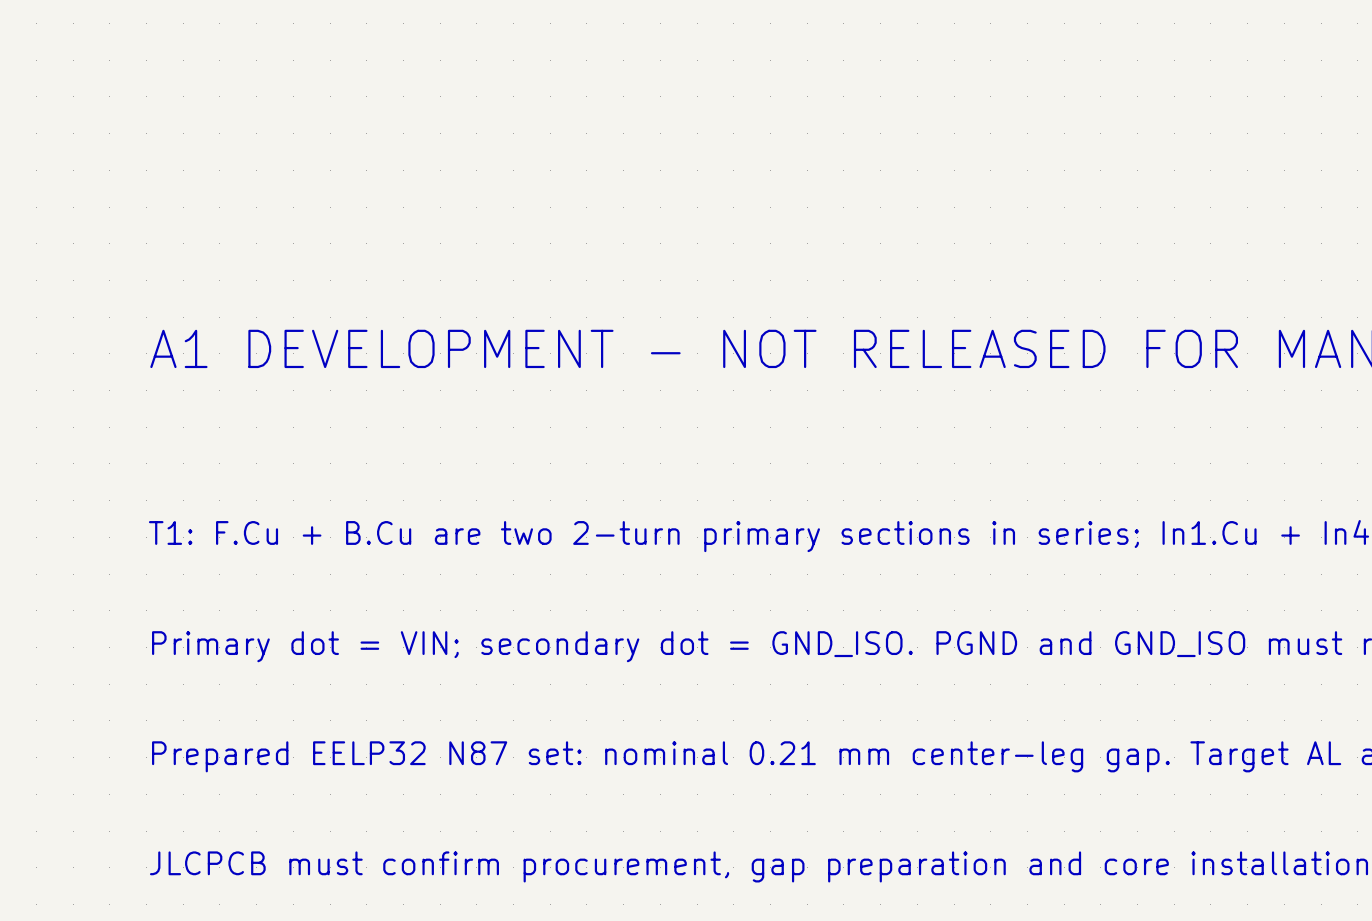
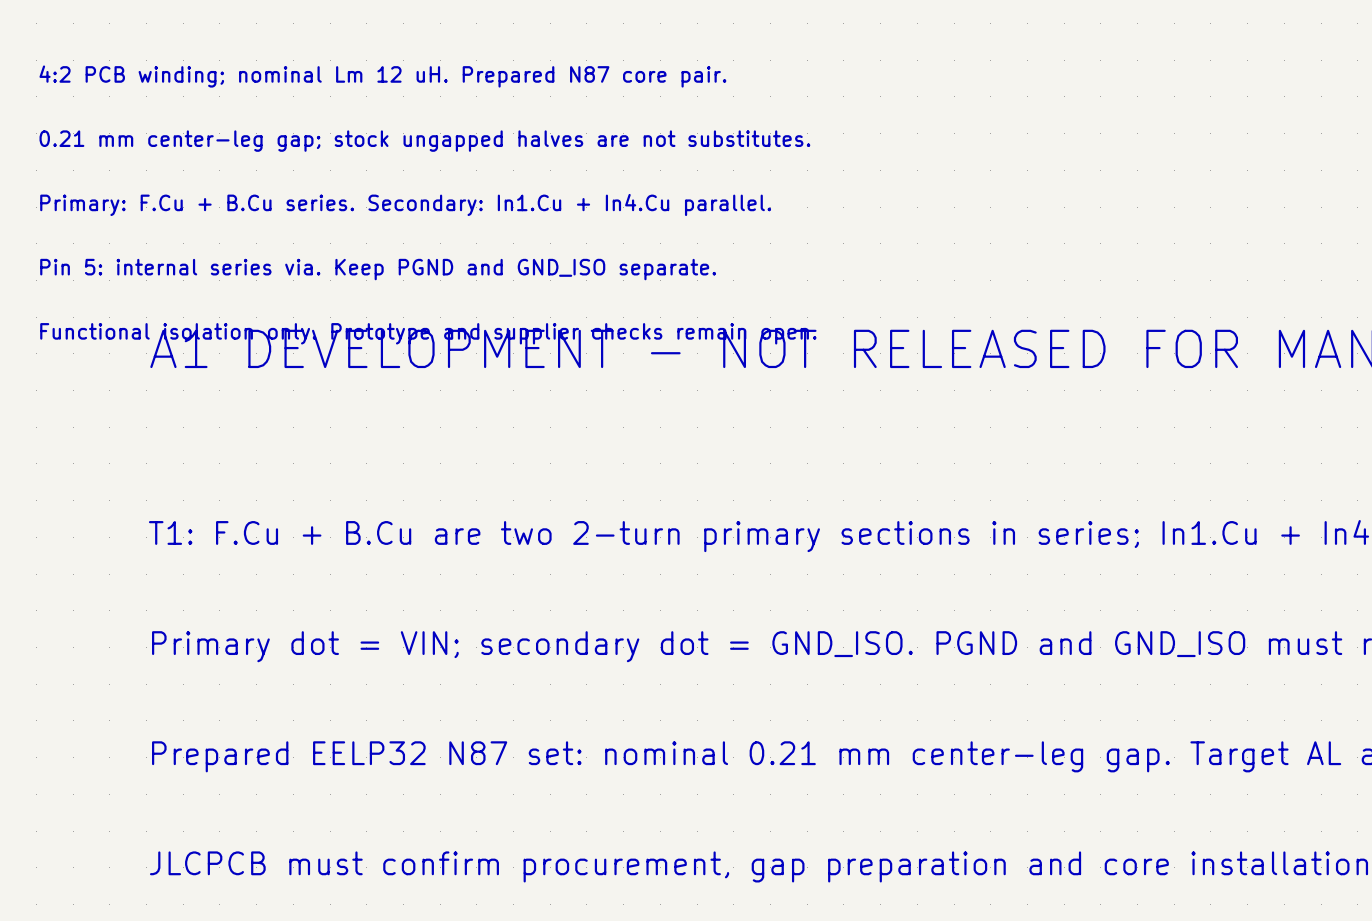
text: none -> 4:2 PCB winding; nominal Lm 12 uH. Prepared N87 core pair. (382, 76)
text: none -> 0.21 mm center-leg gap; stock ungapped halves are not substitutes. (424, 141)
text: none -> Primary: F.Cu + B.Cu series. Secondary: In1.Cu + In4.Cu parallel. (405, 204)
text: none -> Pin 5: internal series via. Keep PGND and GND_ISO separate. (378, 269)
text: none -> Functional isolation only. Prototype and supplier checks remain open. (428, 333)

